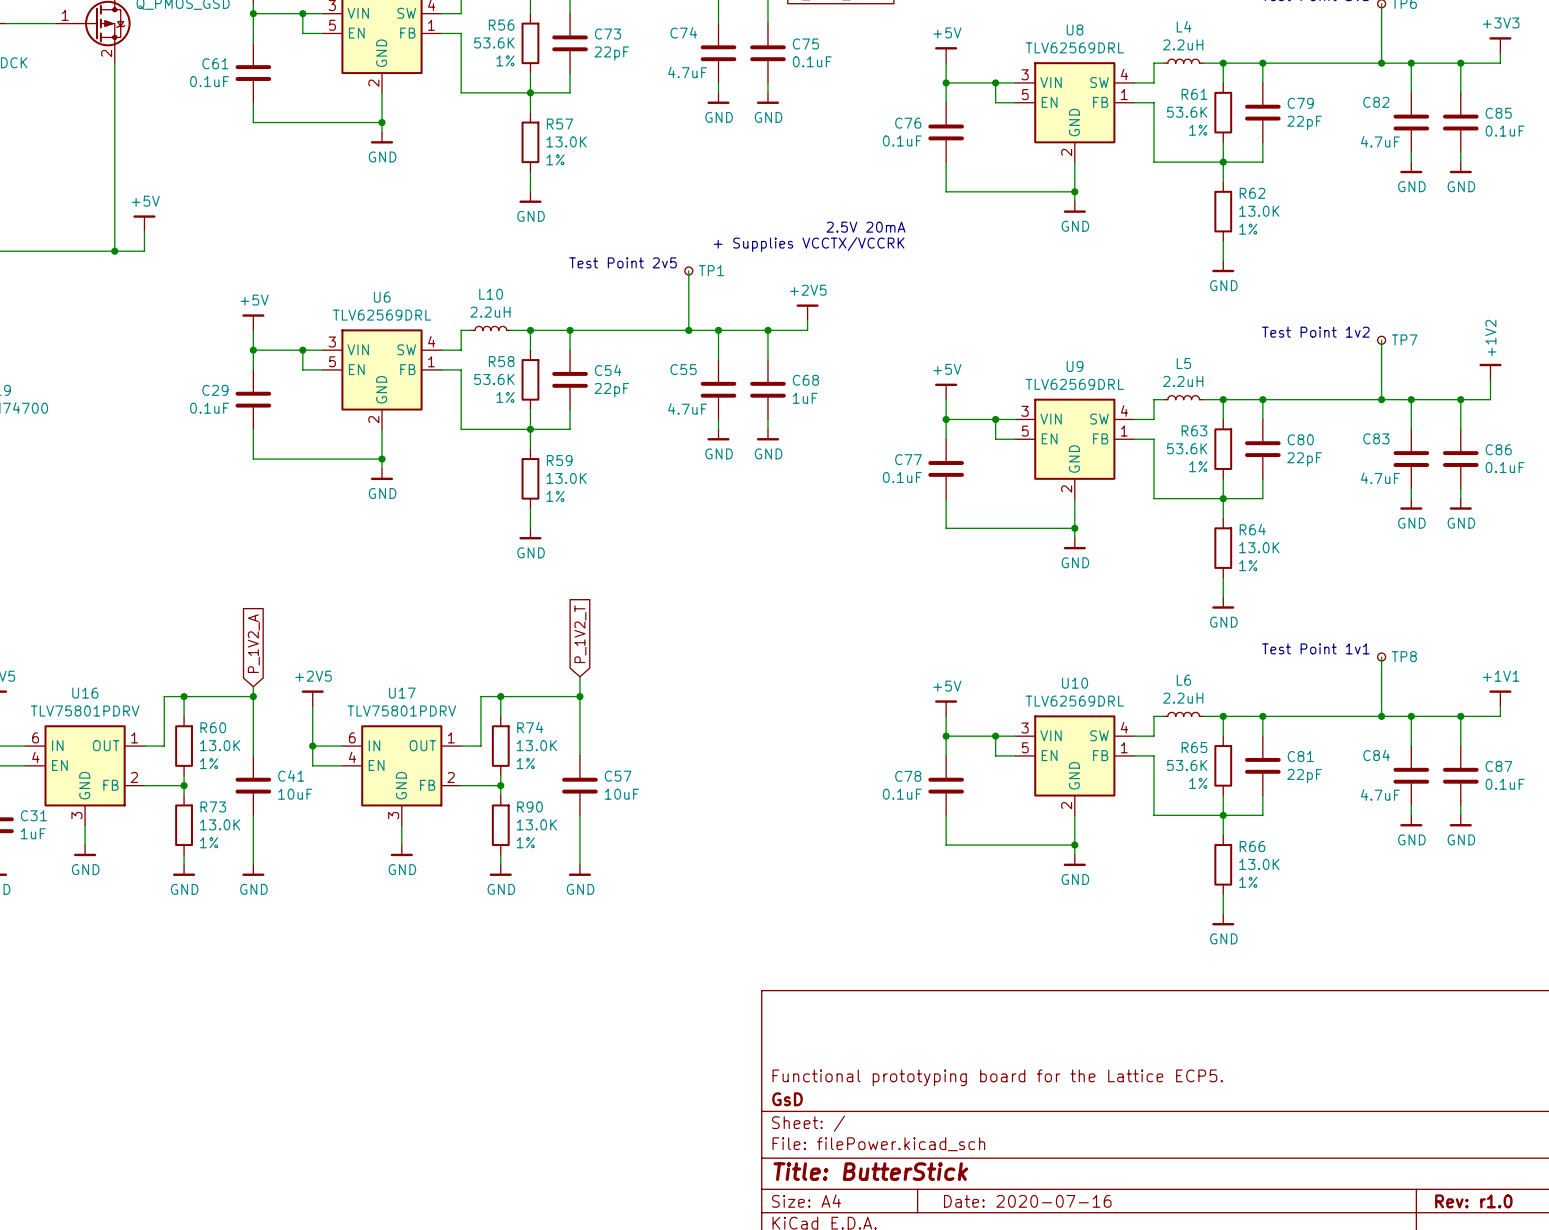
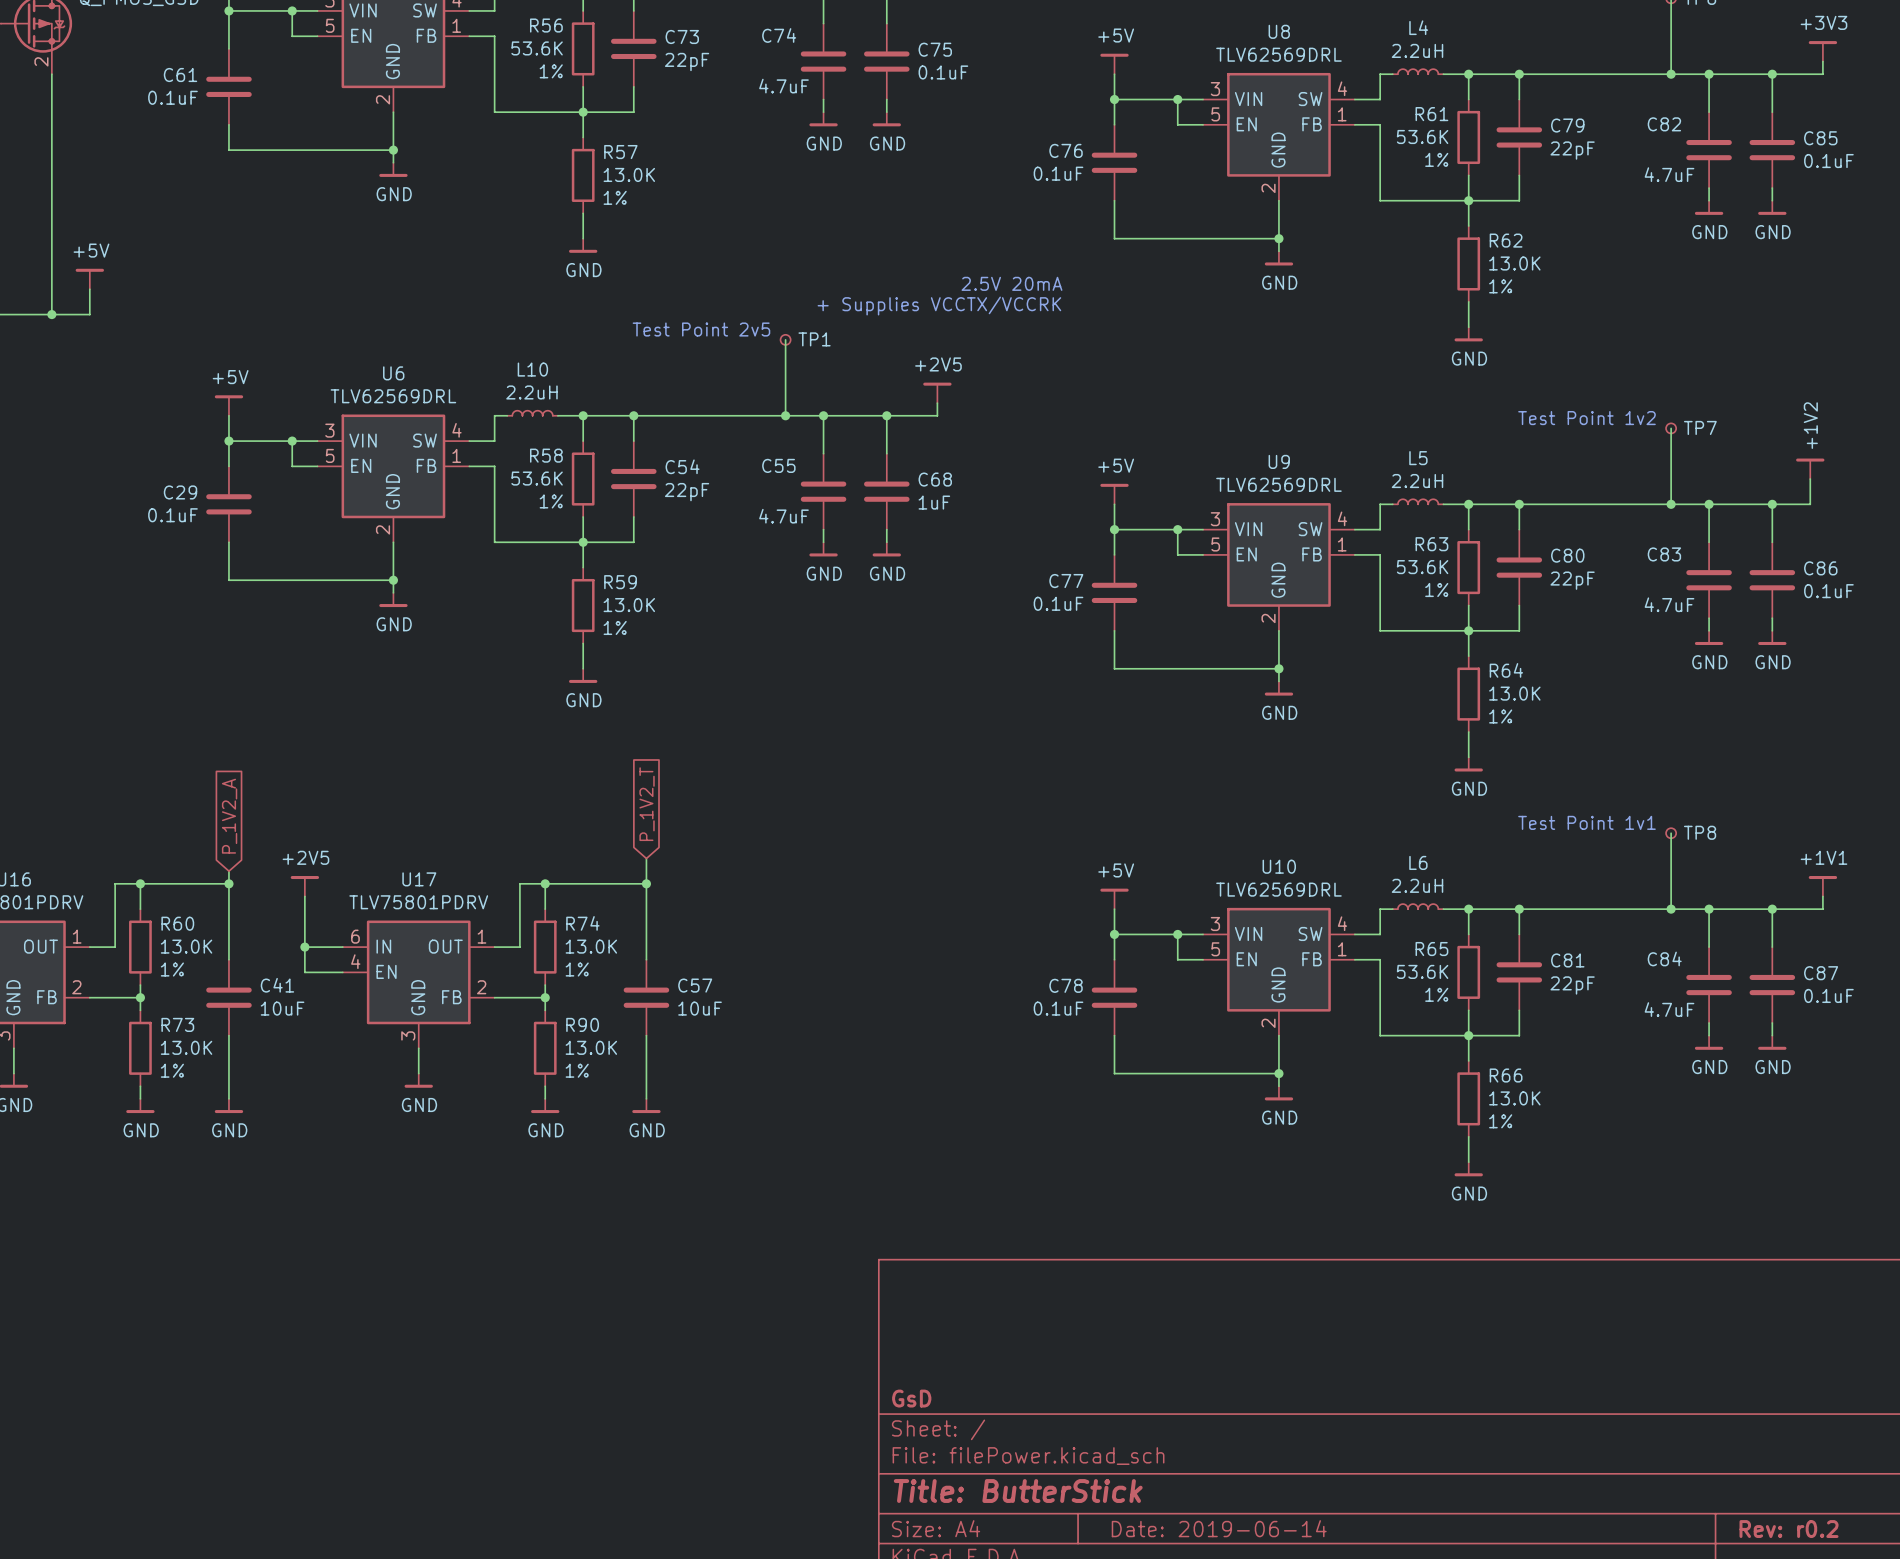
title block: Functional prototyping board for the Lattice ECP5. (997, 1077) -> none
title block: Date: 2020-07-16 (1027, 1201) -> Date: 2019-06-14 (1219, 1528)
title block: Rev: r1.0 (1473, 1201) -> Rev: r0.2 (1789, 1529)

